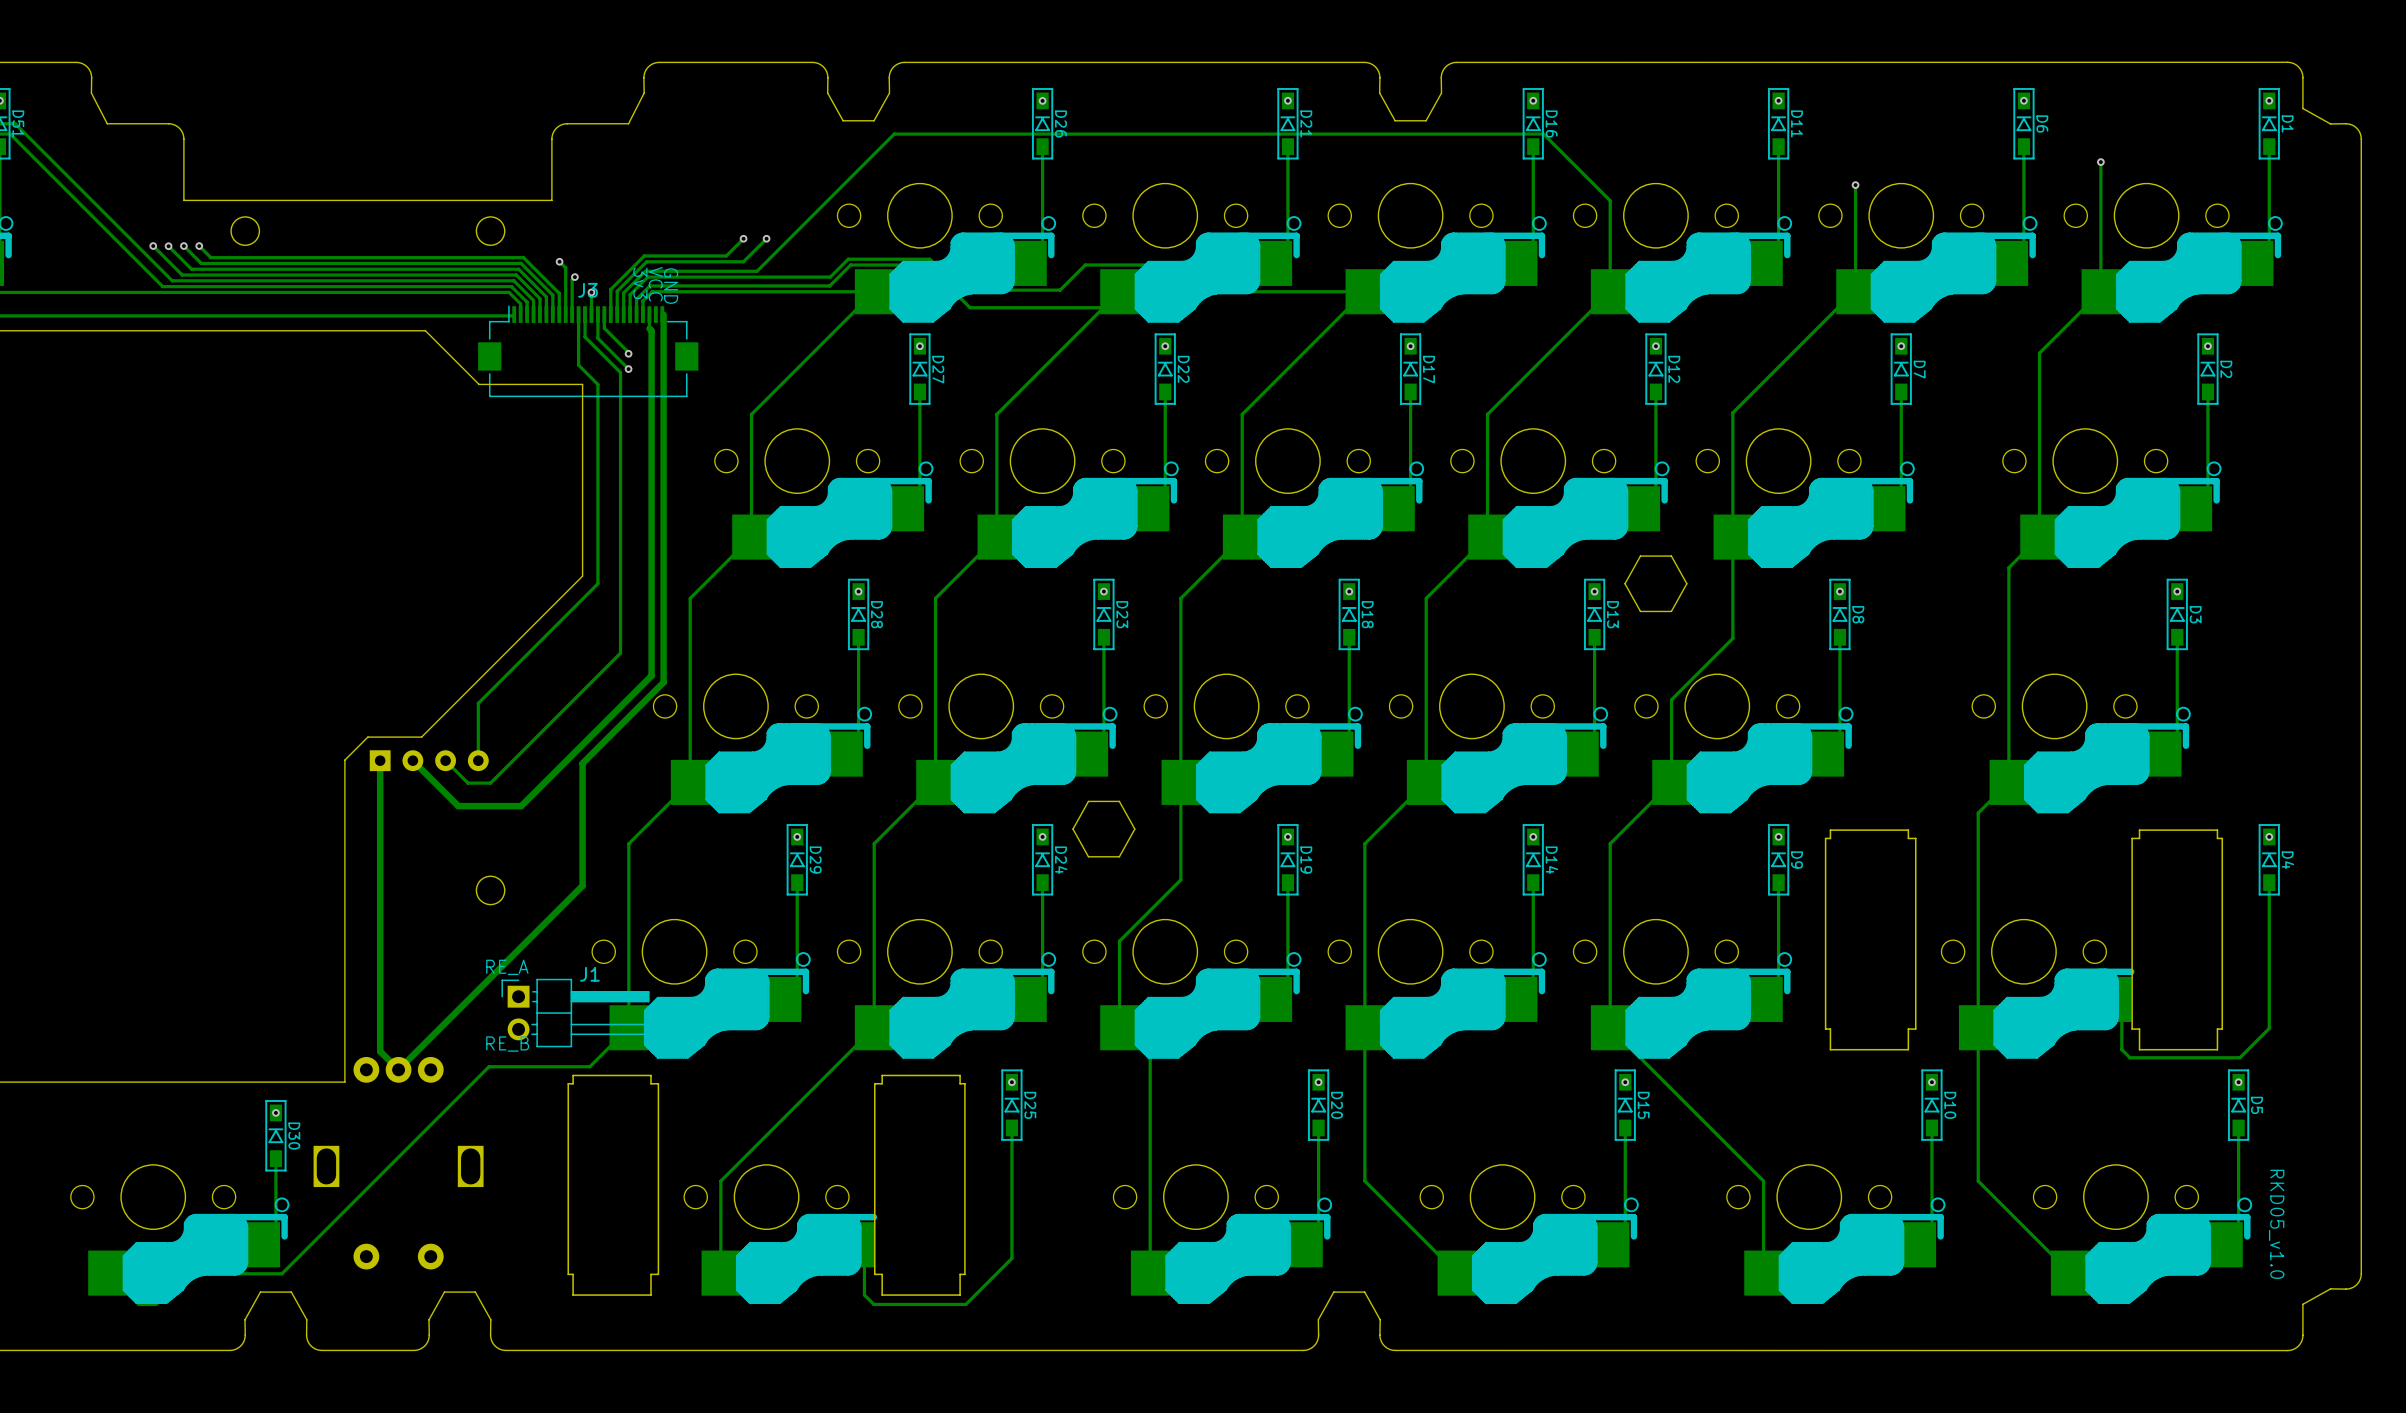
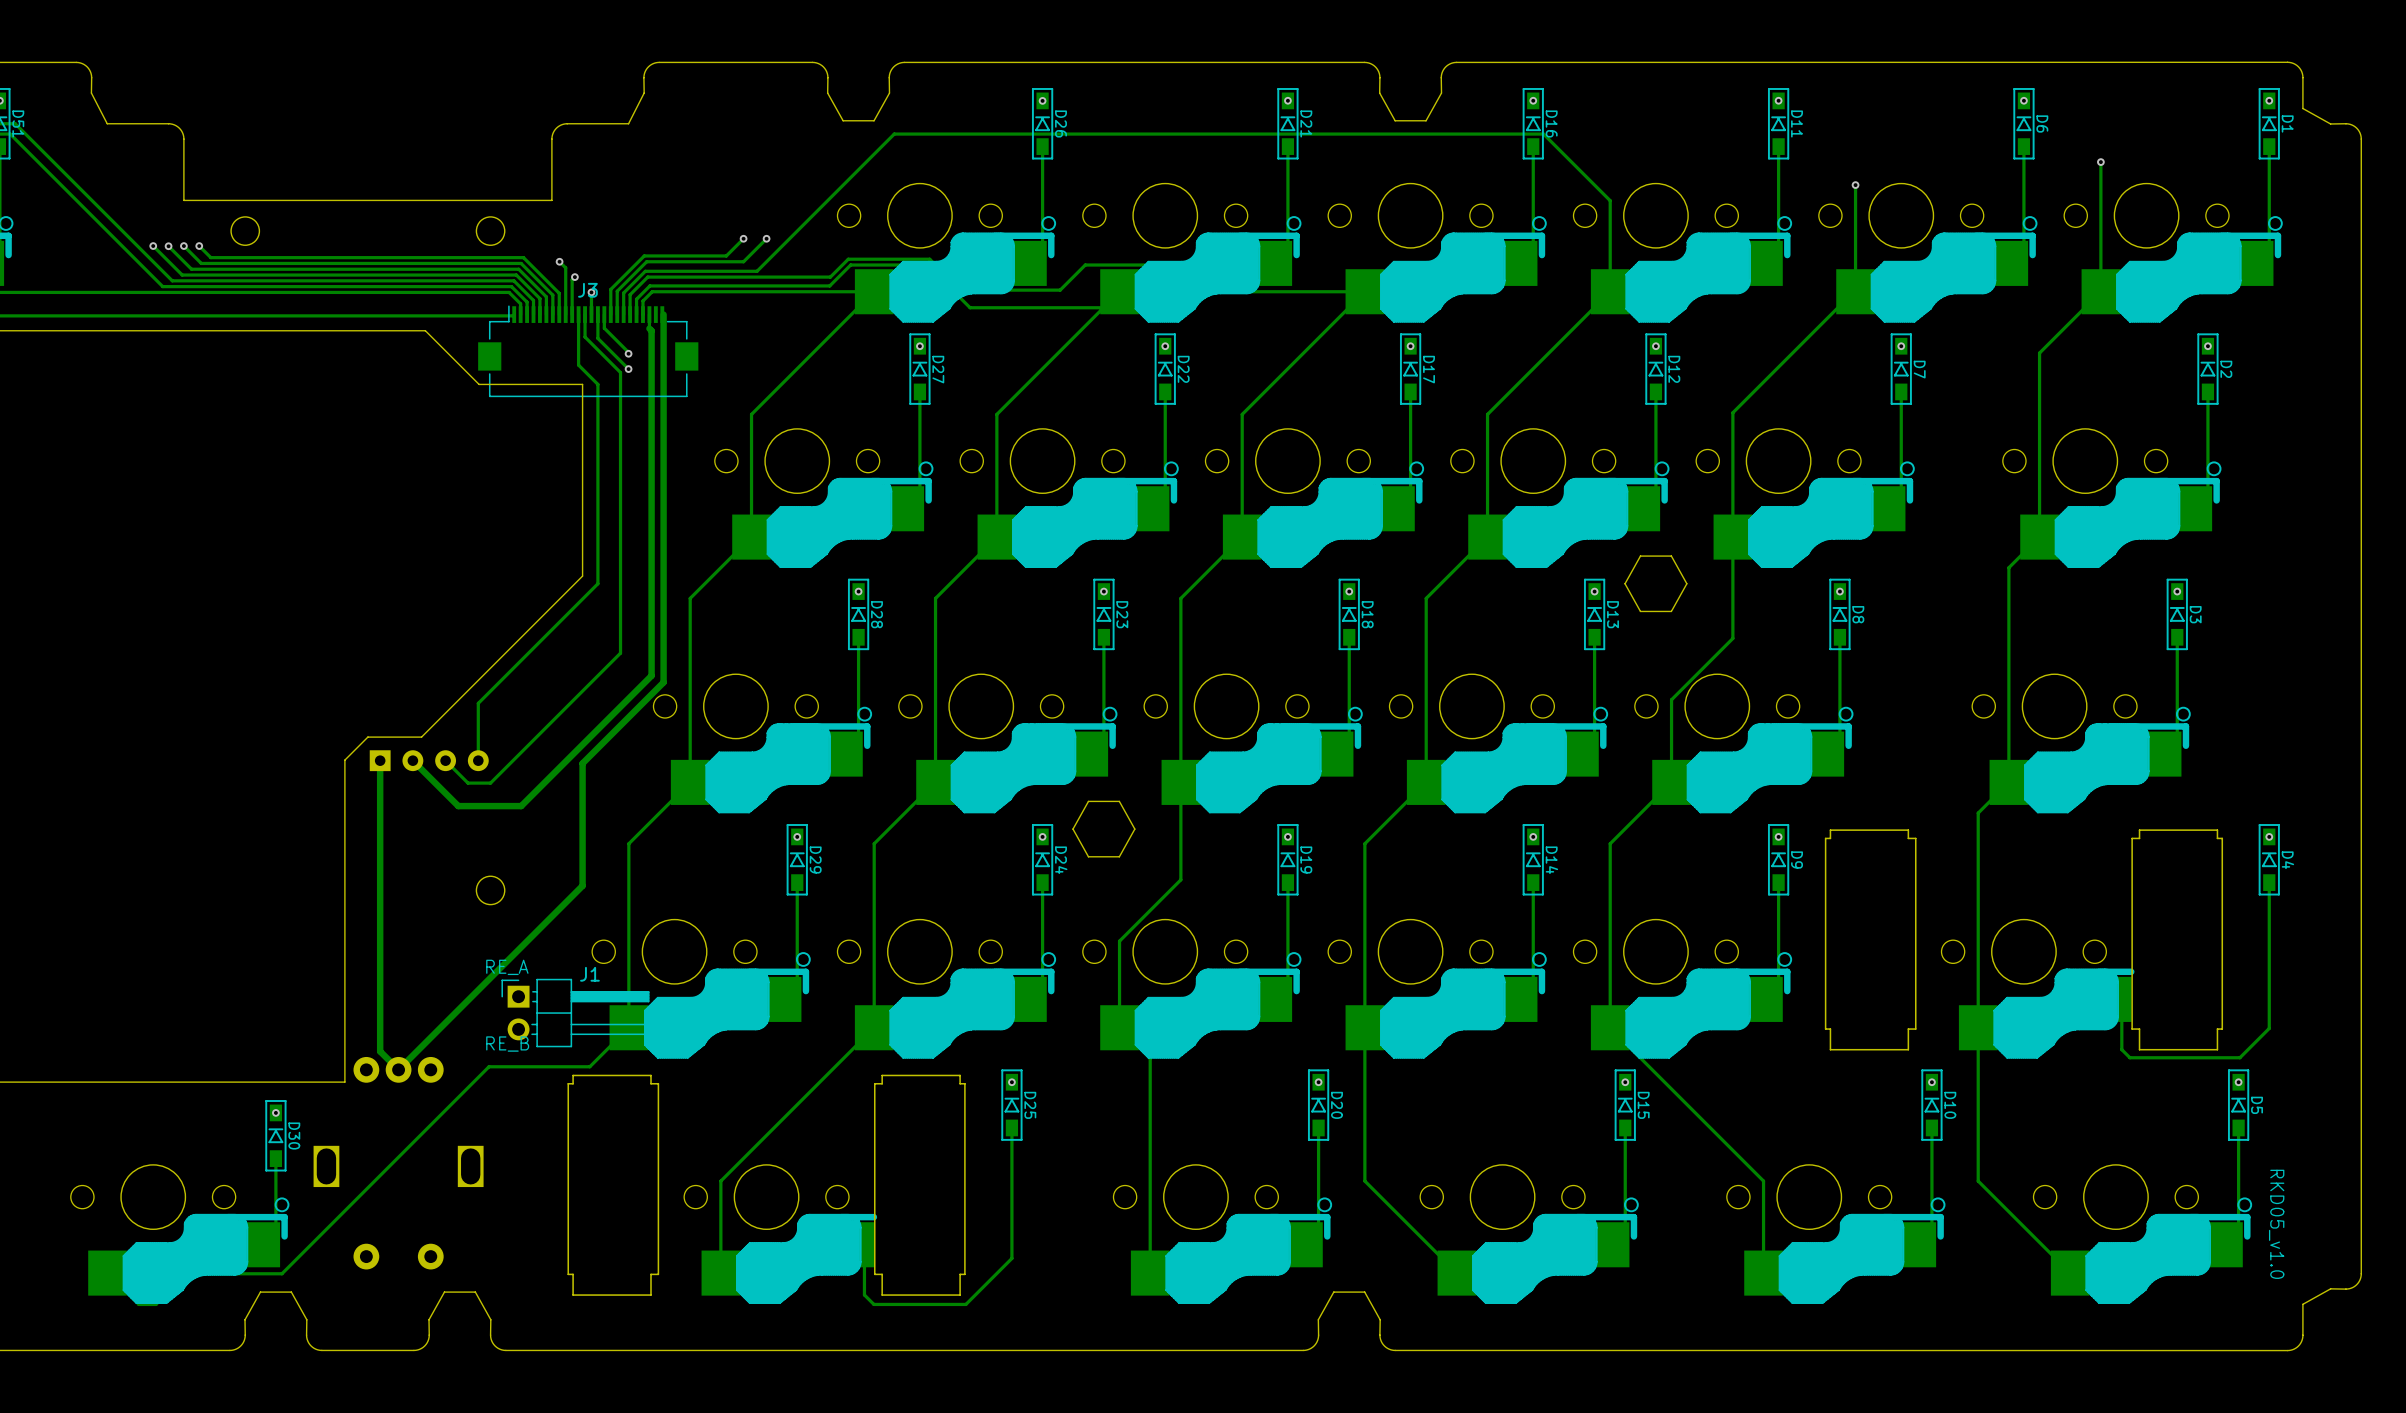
text: 3v3 (640, 283) -> none
text: VCC (655, 284) -> none
text: GND (671, 286) -> none

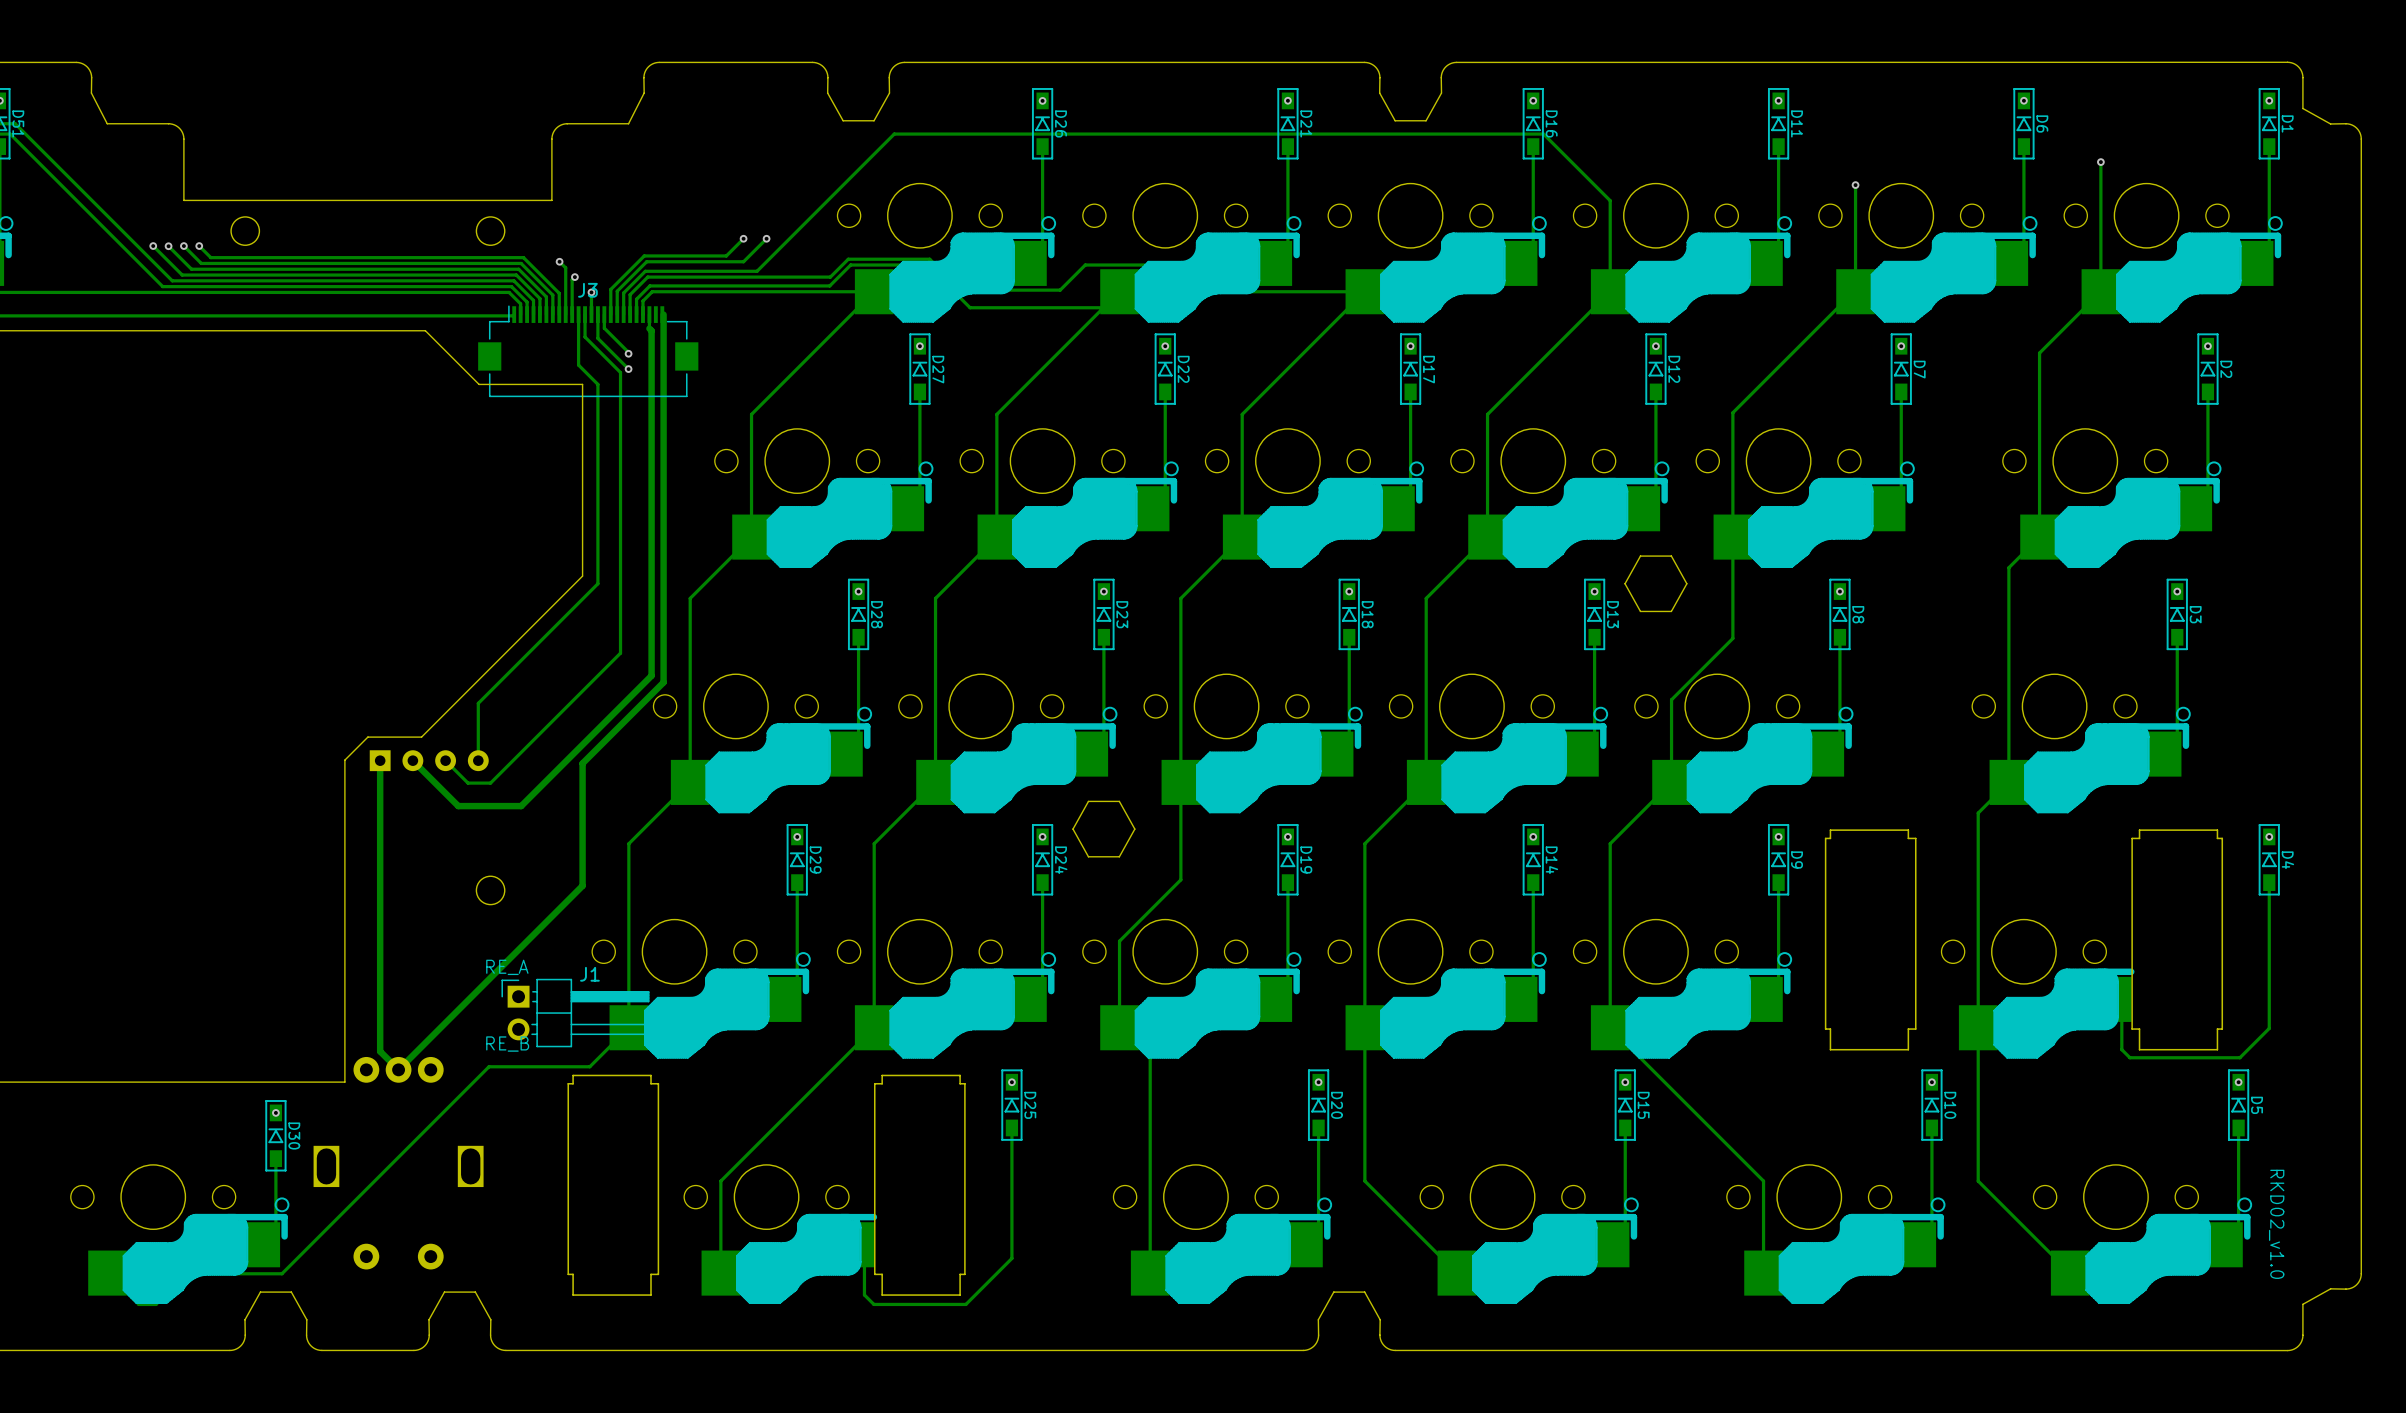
text: RKD05_v1.0 (2276, 1224) -> RKD02_v1.0 (2276, 1224)

